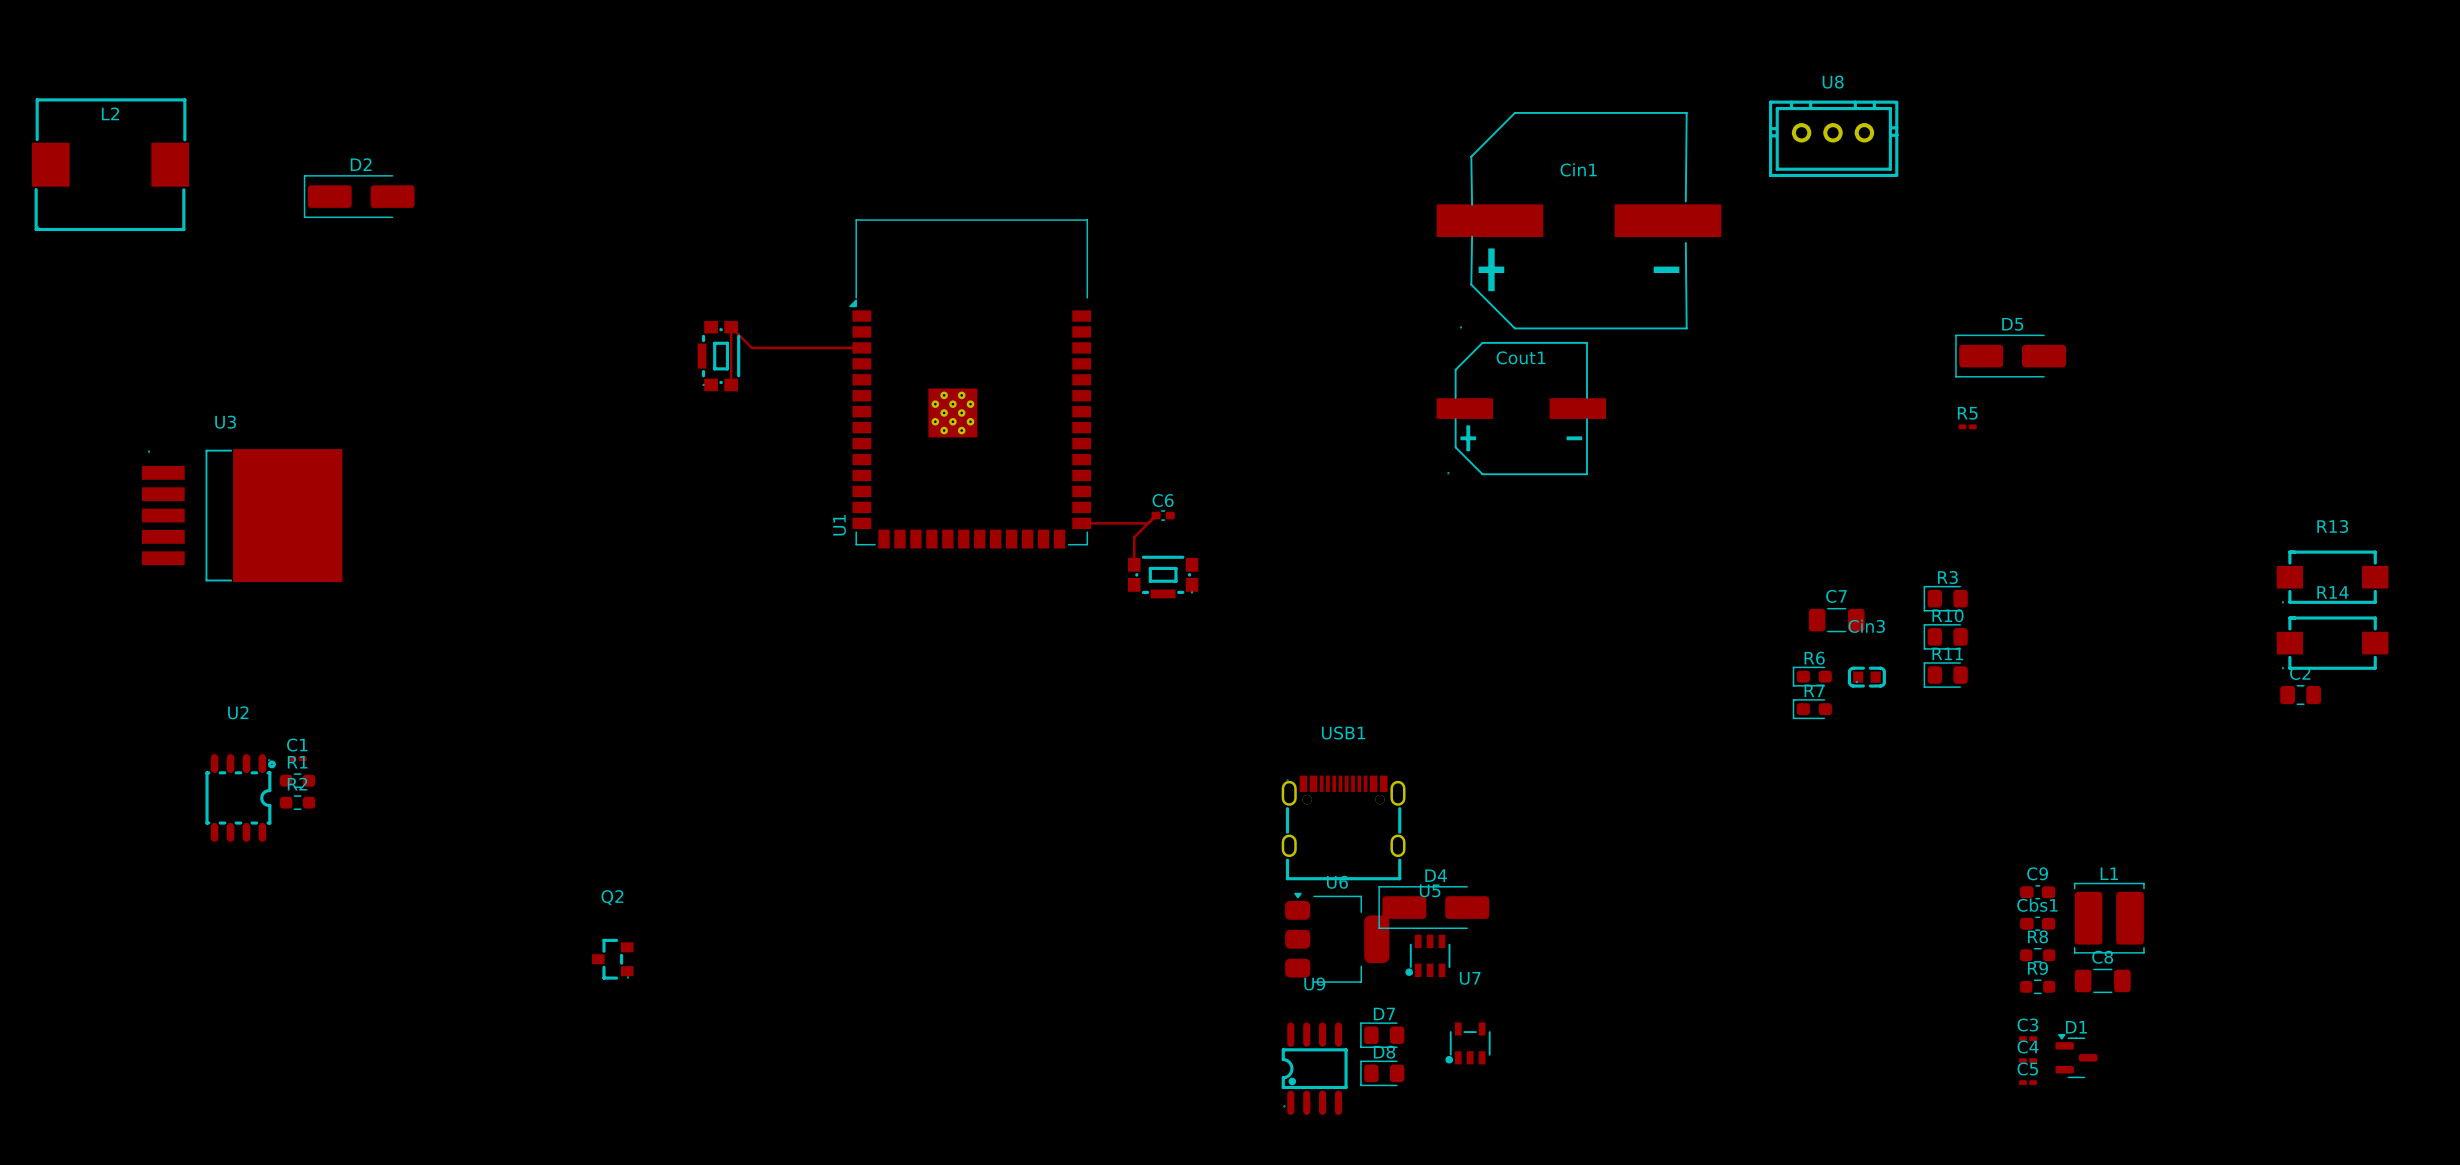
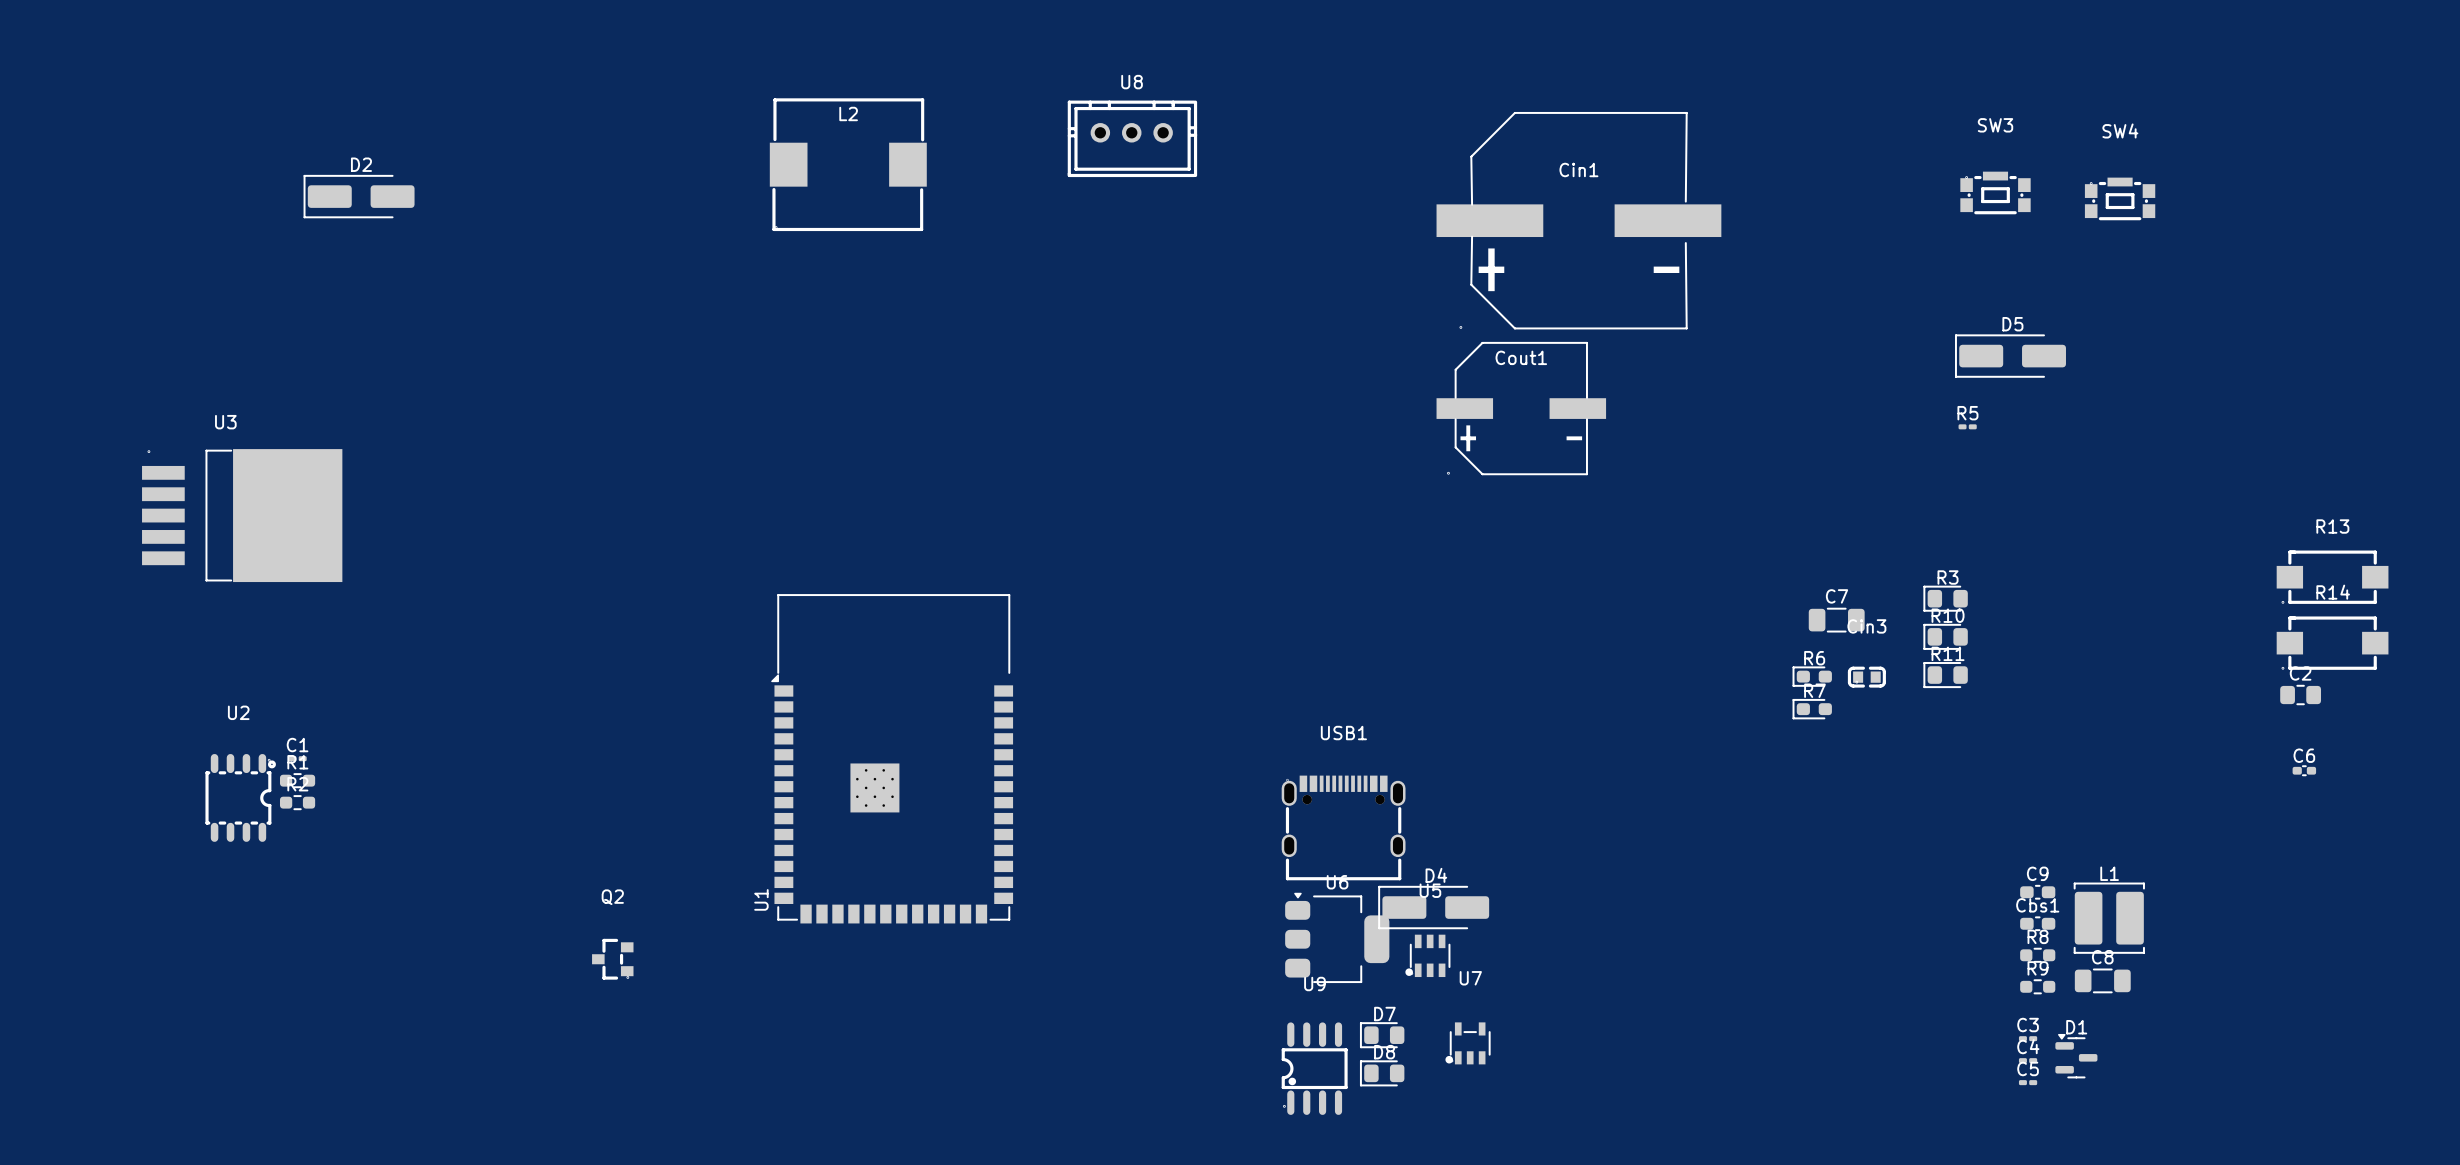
U8 position: (1833, 138) -> (1132, 138)
L2 position: (110, 164) -> (848, 164)
SW3: none -> (1995, 192)
SW4: none -> (2120, 198)
track: (861, 347) (751, 347) (731, 327) (731, 384) -> none
part: (718, 356) -> none
U1 position: (970, 383) -> (892, 758)
track: (1156, 515) (1134, 537) (1134, 564) -> none
C6 position: (1163, 515) -> (2304, 770)
track: (1081, 523) (1148, 523) -> none
part: (1163, 577) -> none

